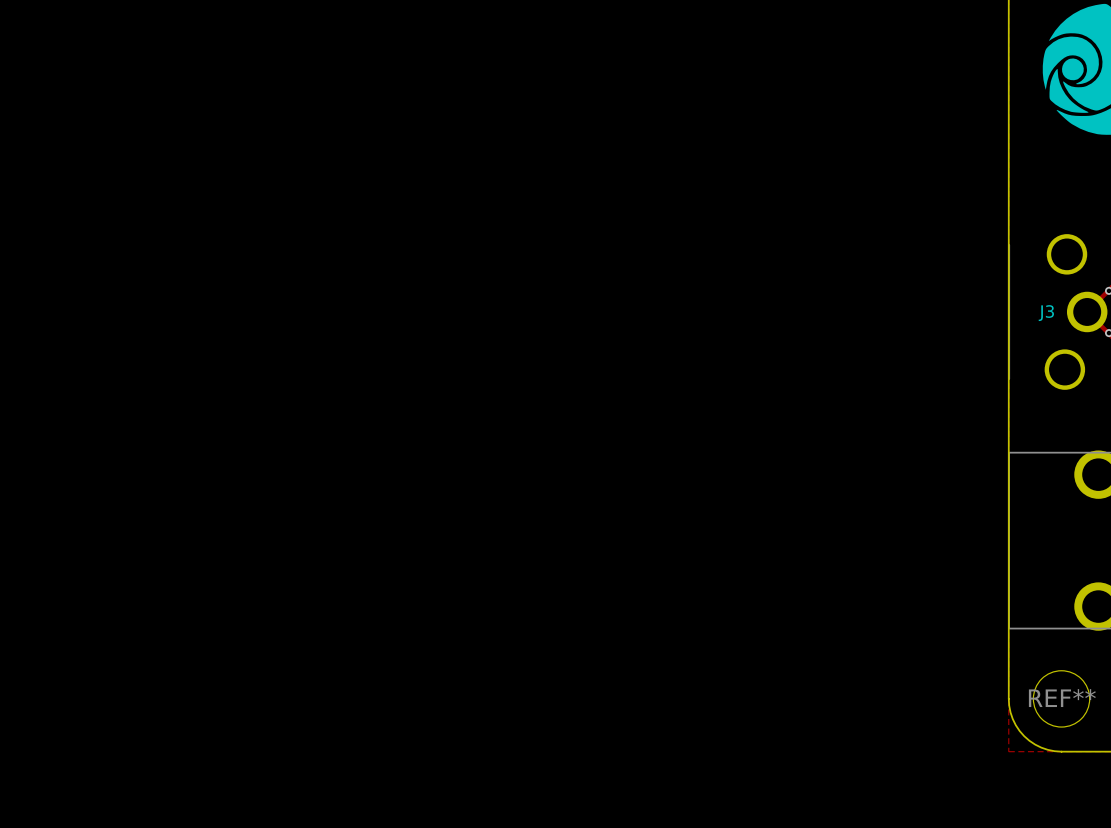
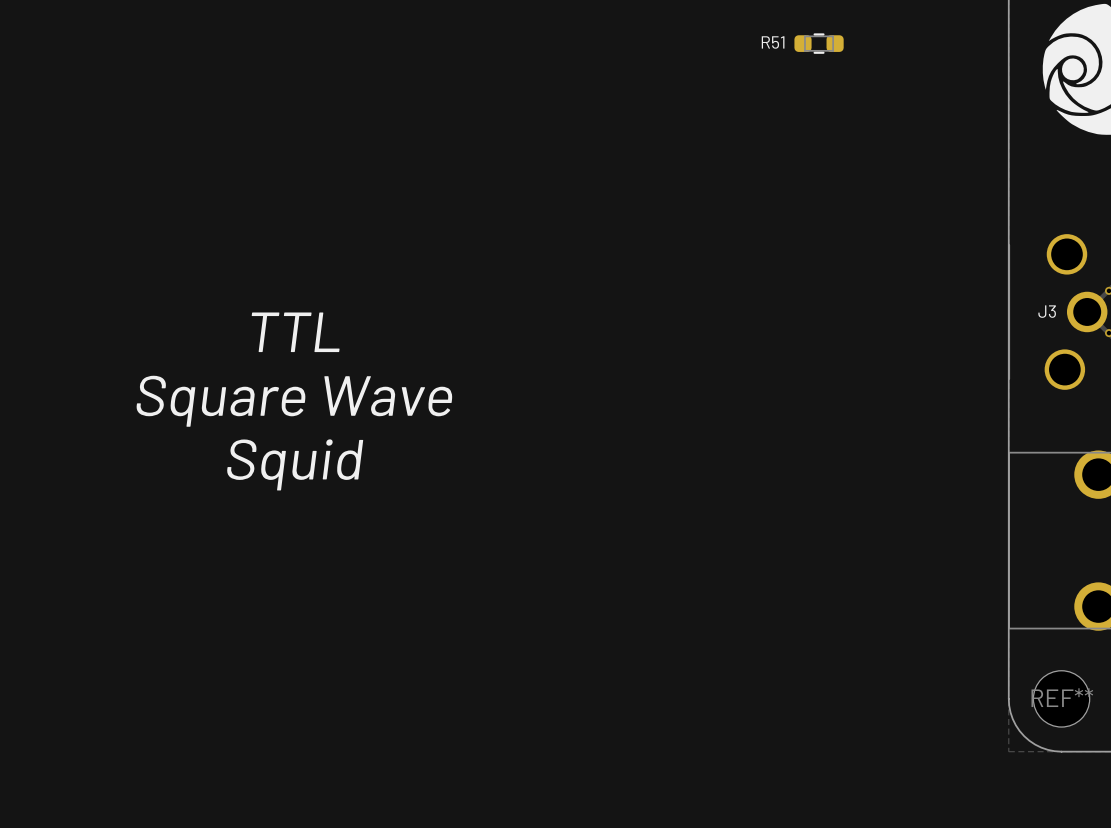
R51: none -> (819, 43)
text: none -> TTL (295, 332)
text: none -> Square Wave (294, 401)
text: none -> Squid (294, 464)

